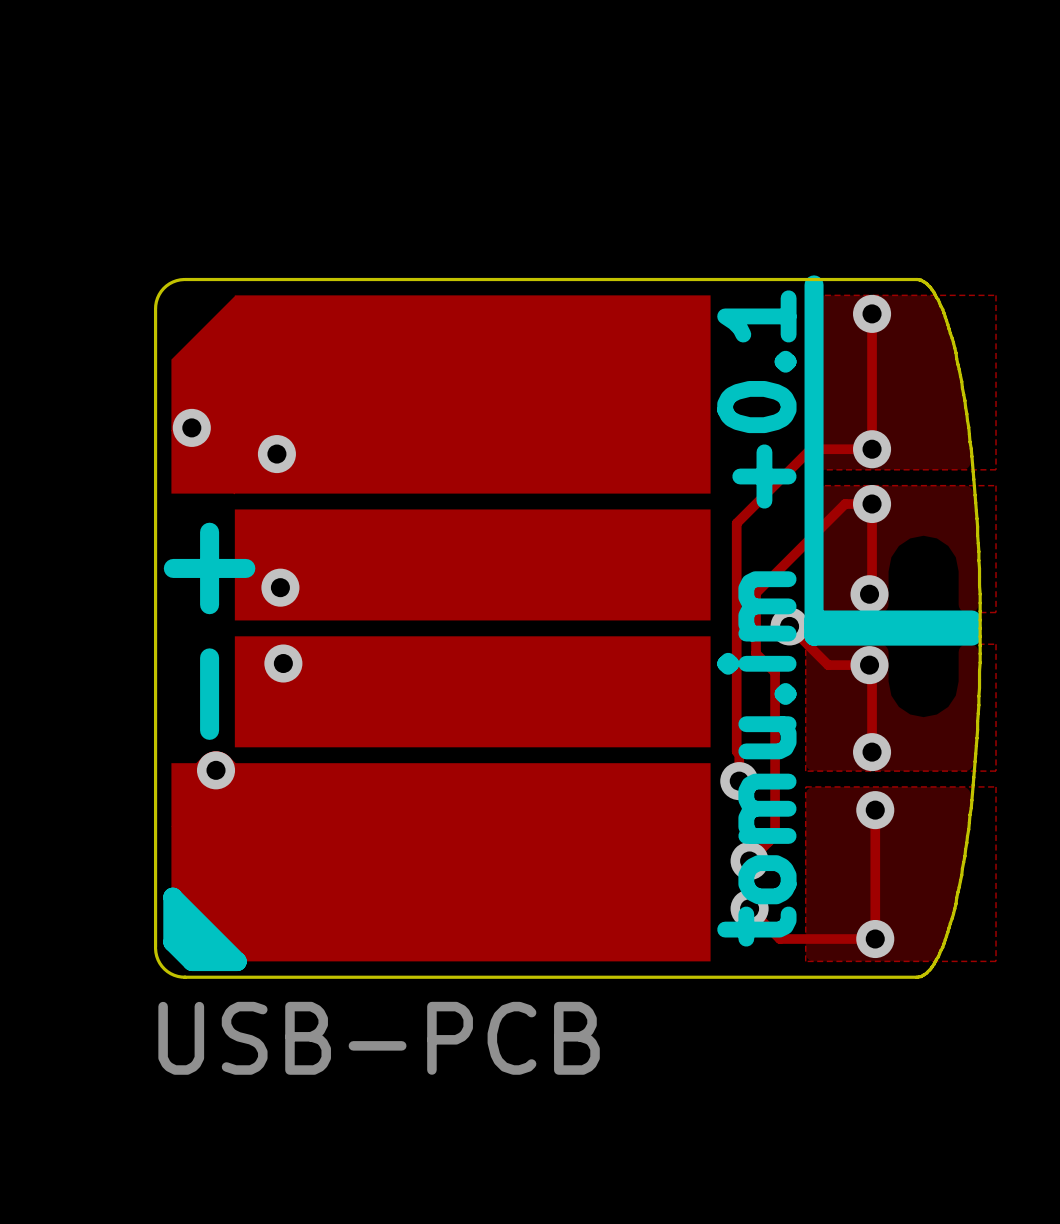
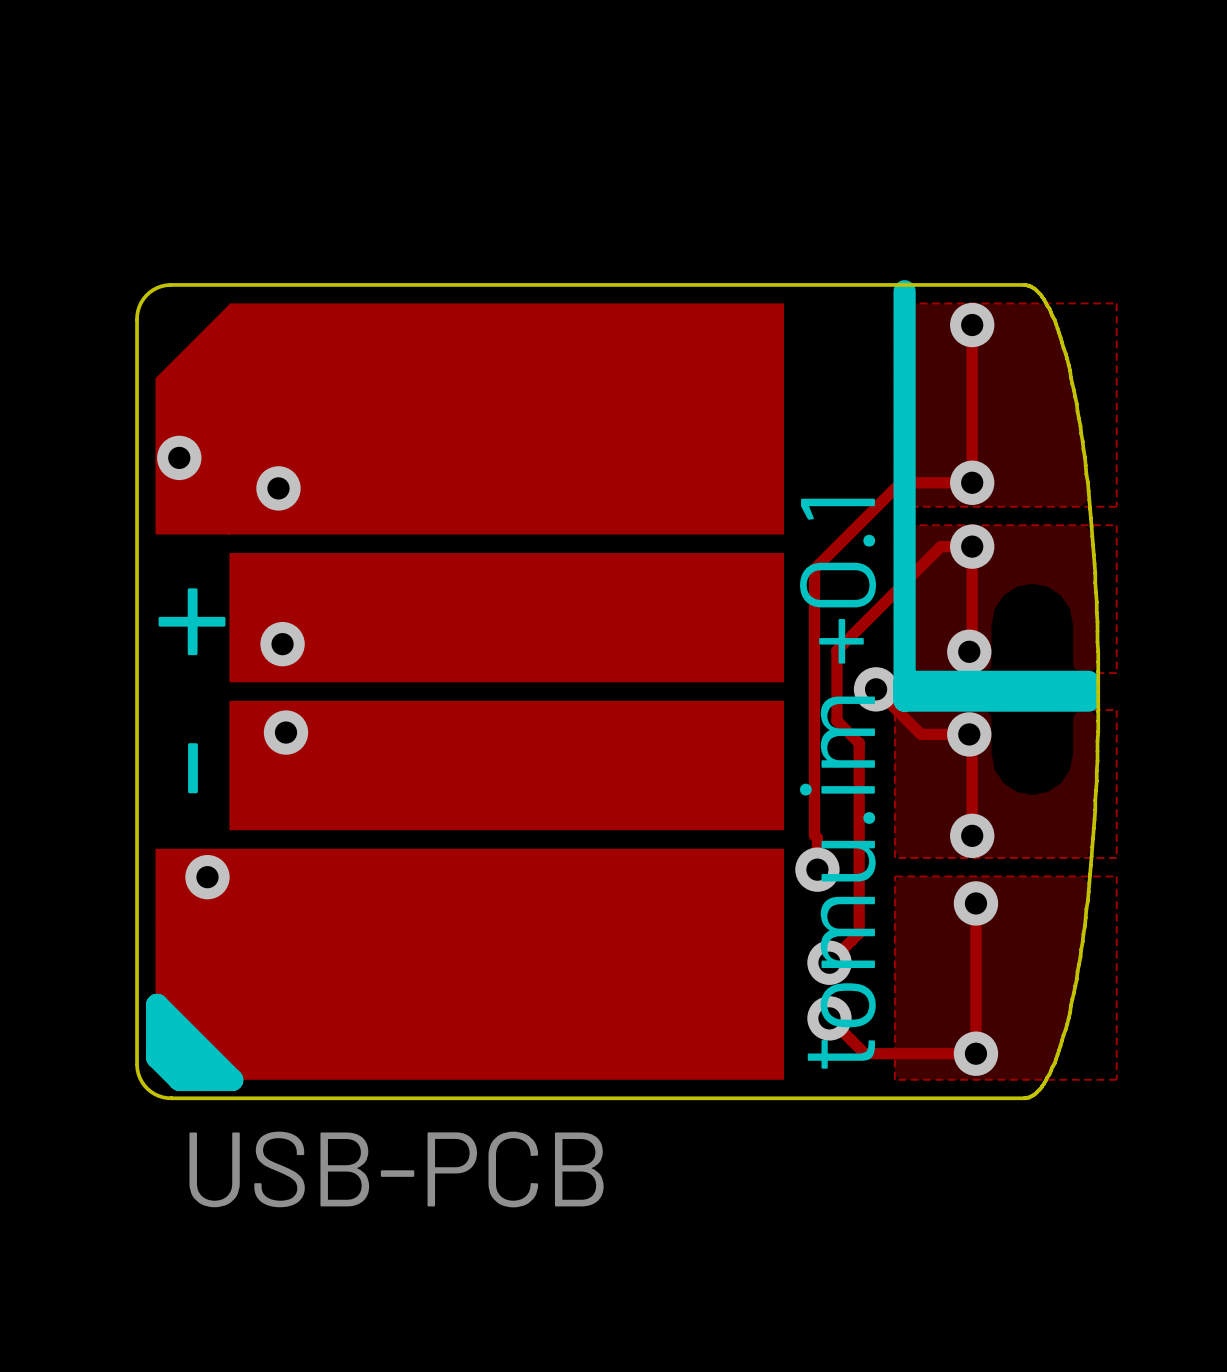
via position: (216, 770) -> (207, 877)

